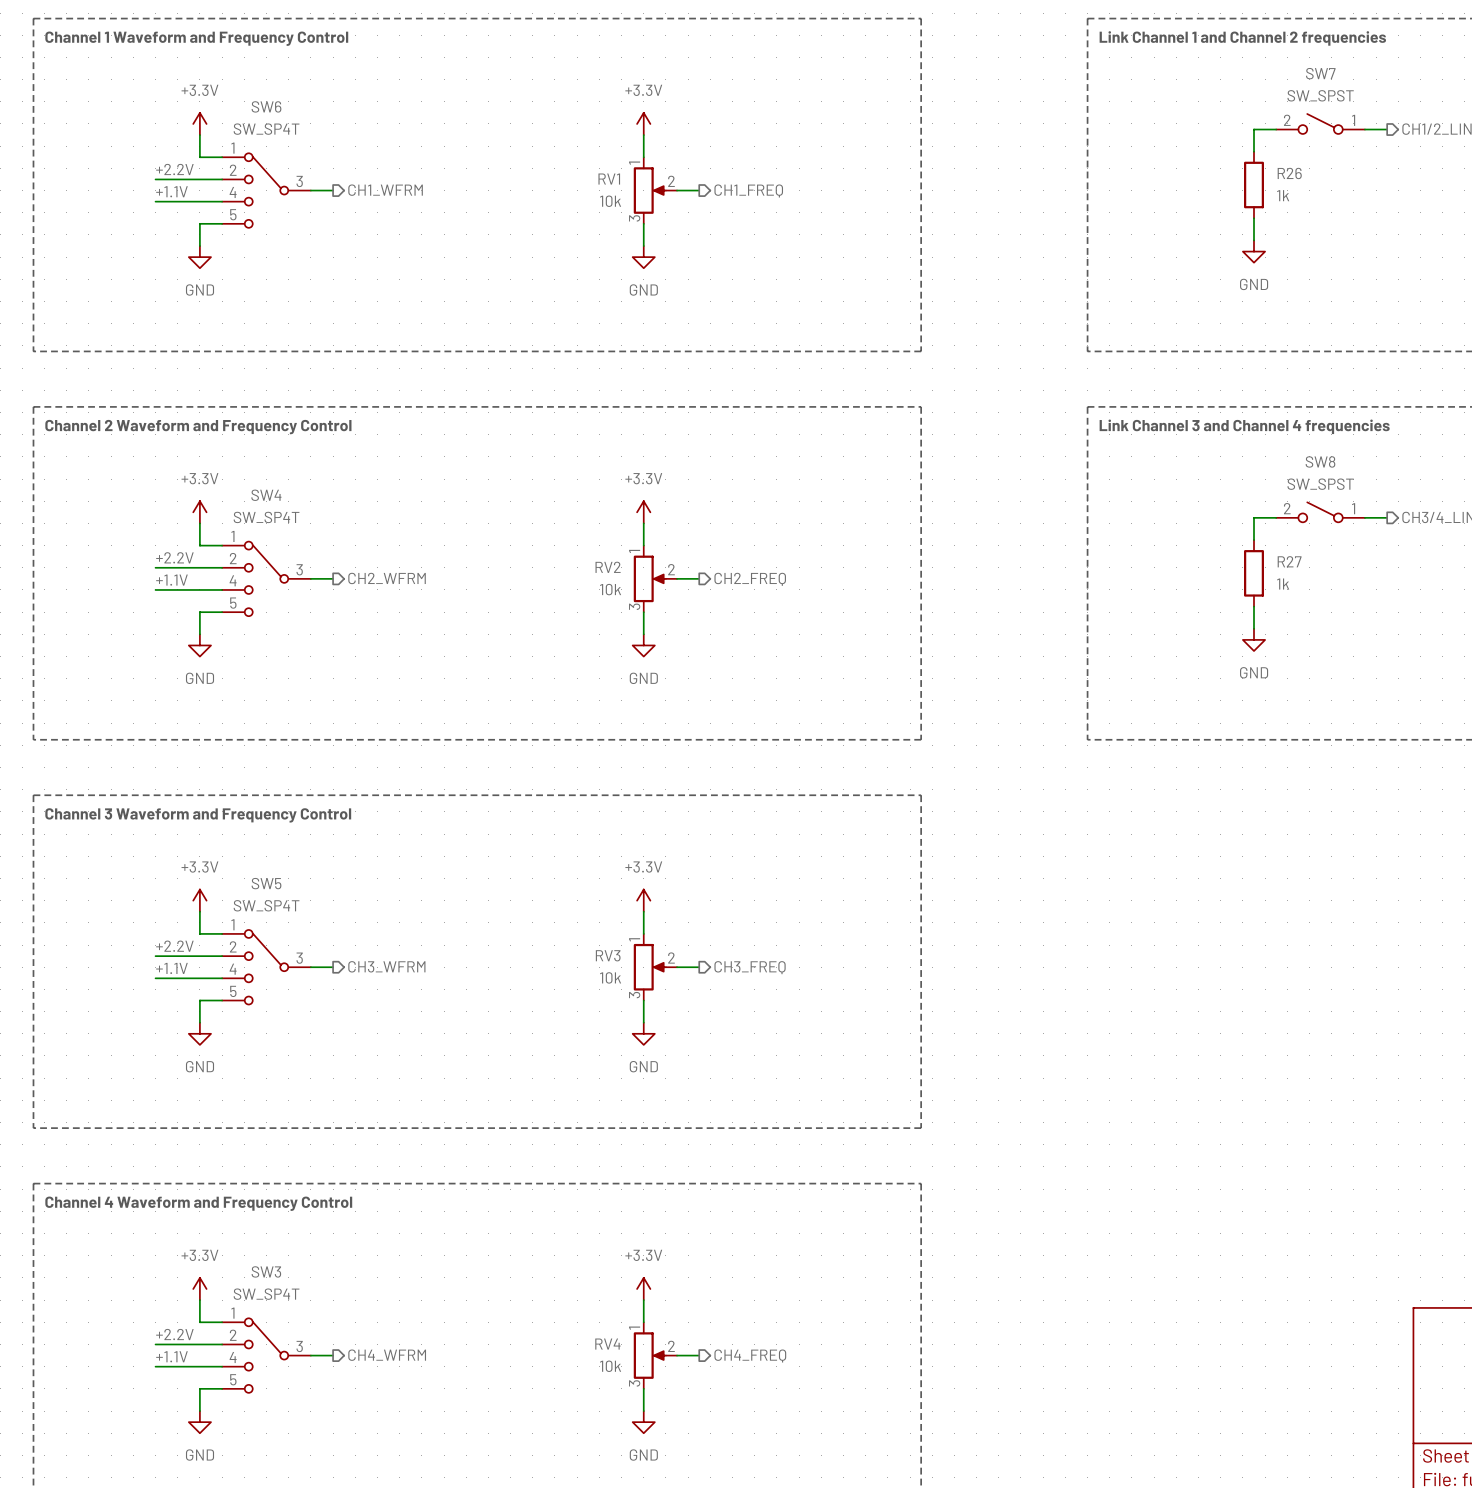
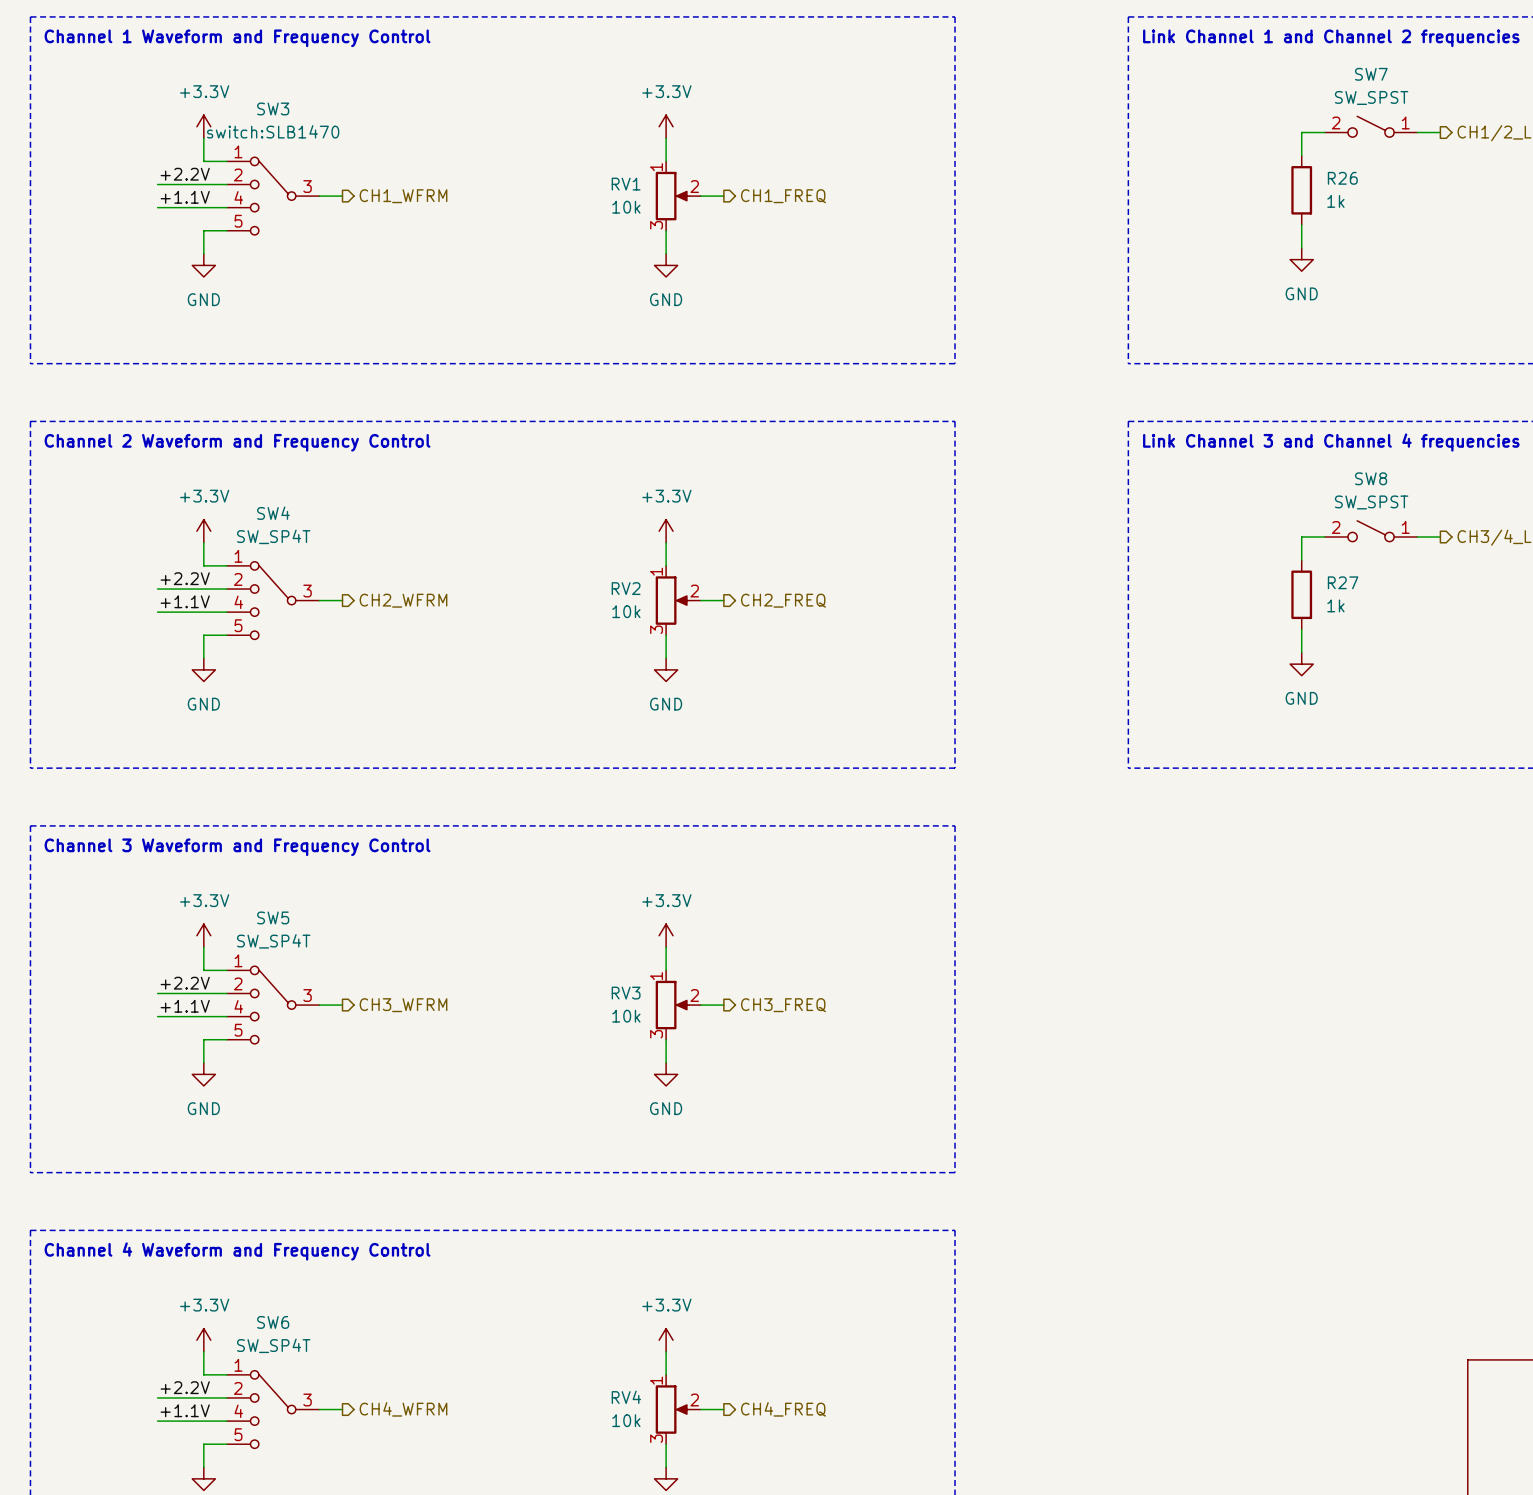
SW6 name: SW6 (266, 106) -> SW3 (273, 108)
SW6 value: SW_SP4T (266, 129) -> switch:SLB1470 (273, 131)
SW3 name: SW3 (266, 1271) -> SW6 (273, 1322)

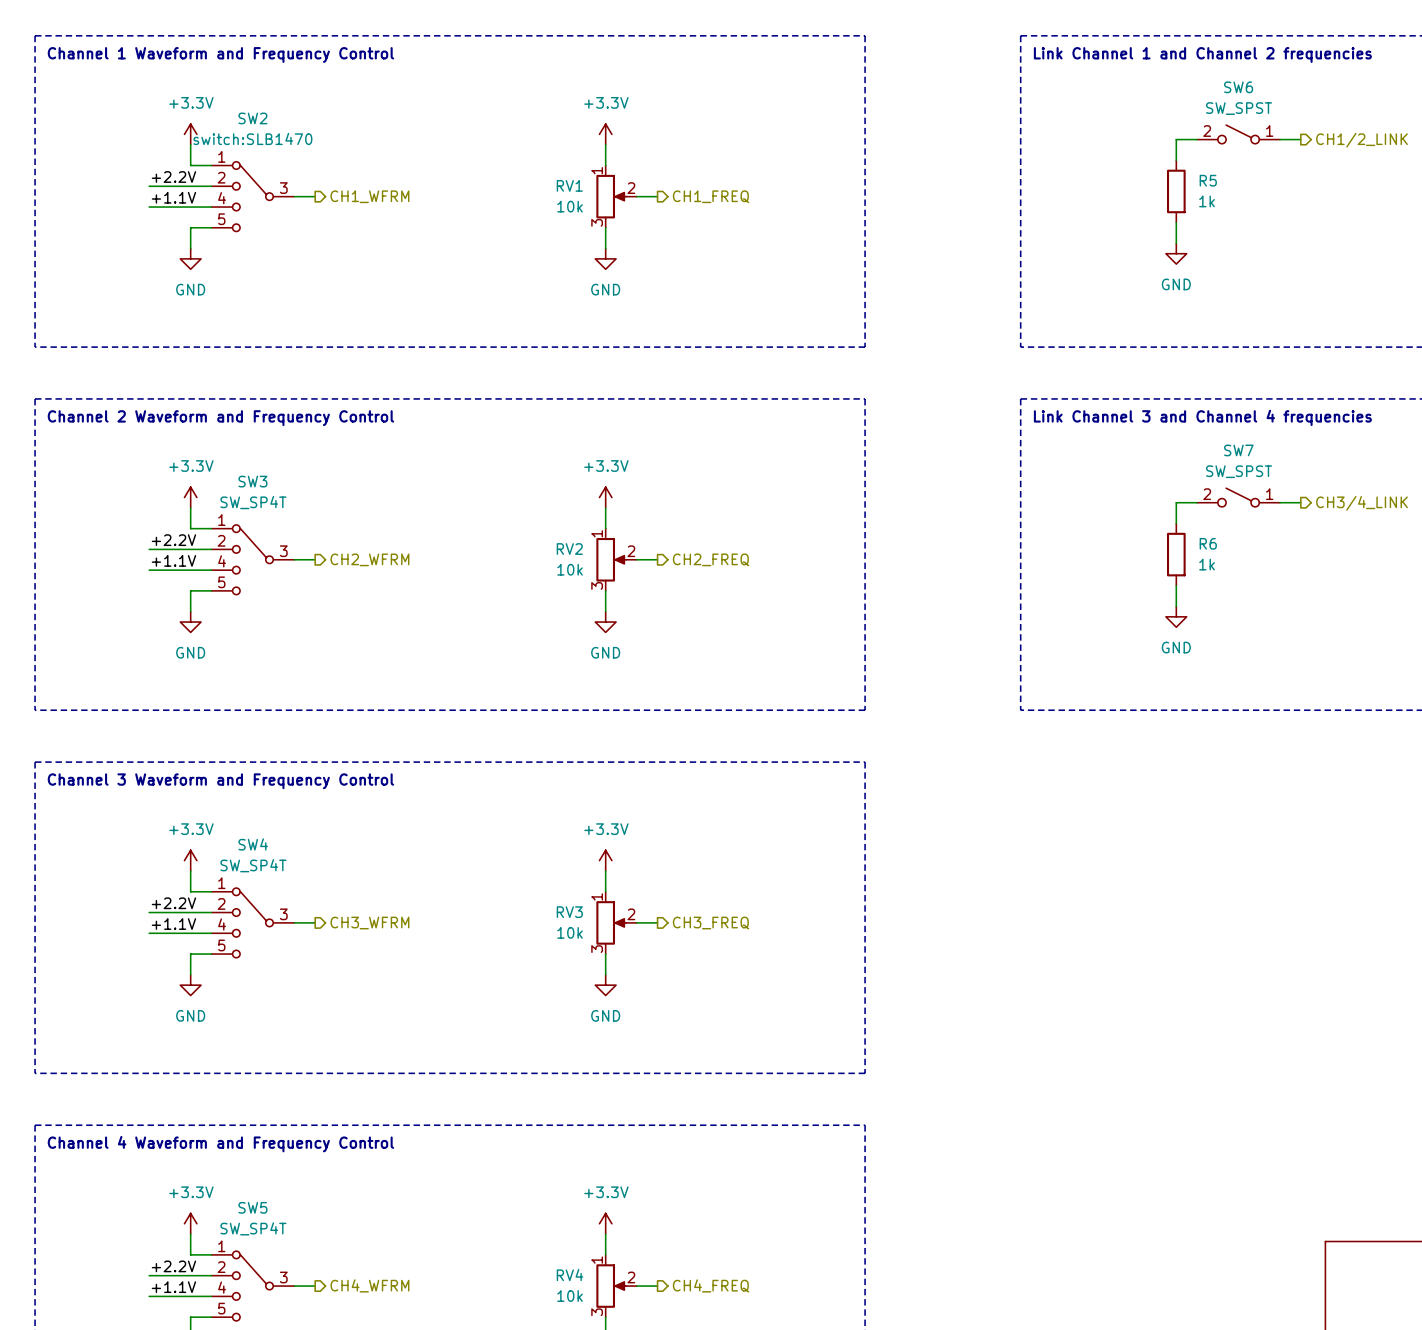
SW7 name: SW7 (1371, 74) -> SW6 (1238, 87)
SW3 name: SW3 (273, 108) -> SW2 (252, 118)
R26 name: R26 (1342, 178) -> R5 (1208, 180)
SW8 name: SW8 (1371, 478) -> SW7 (1238, 450)
SW4 name: SW4 (273, 513) -> SW3 (252, 481)
R27 name: R27 (1343, 582) -> R6 (1208, 543)
SW5 name: SW5 (273, 917) -> SW4 (253, 844)
SW6 name: SW6 (273, 1322) -> SW5 (252, 1207)

